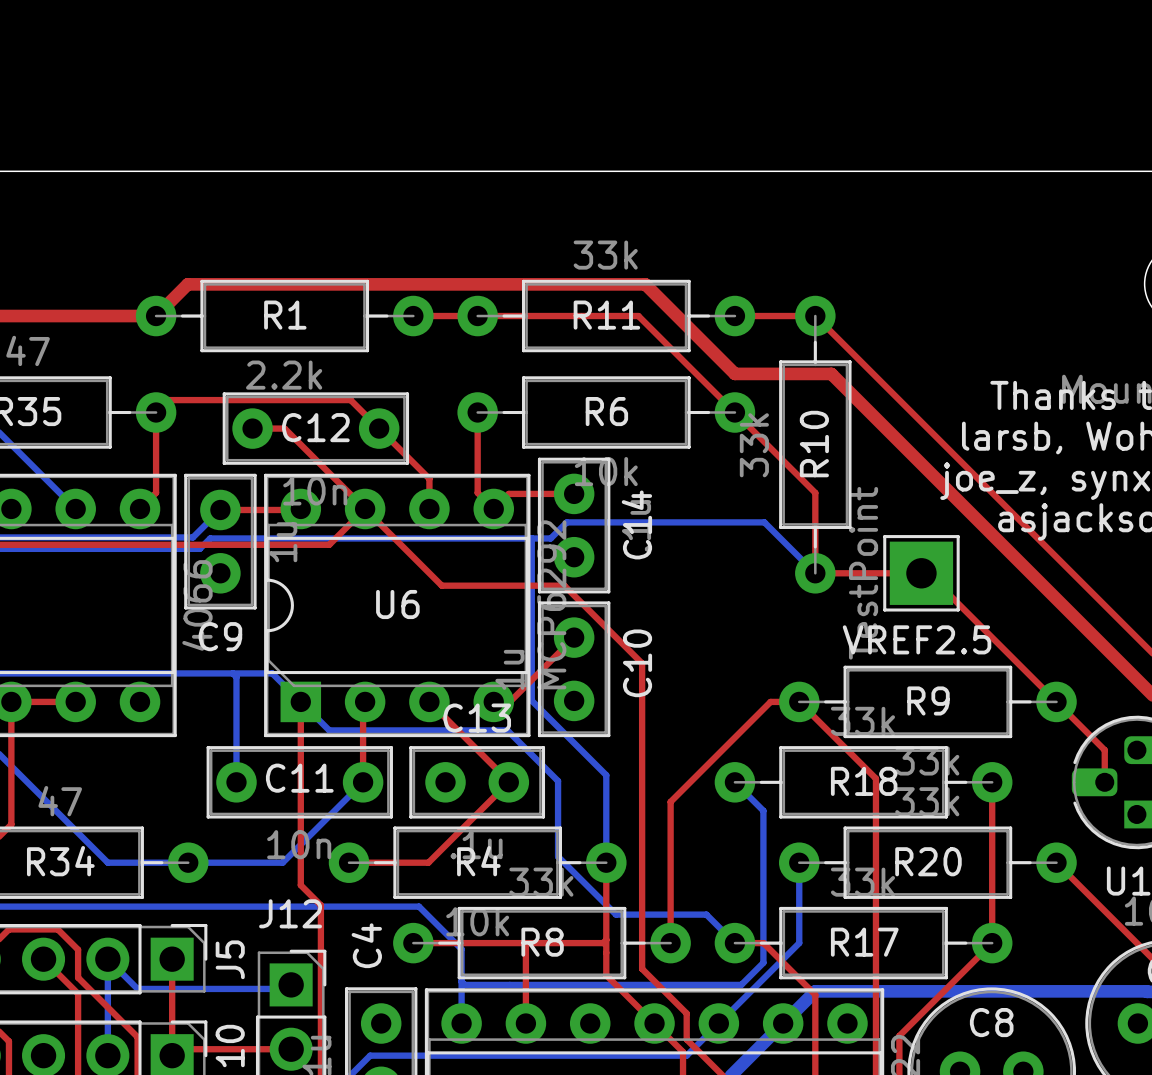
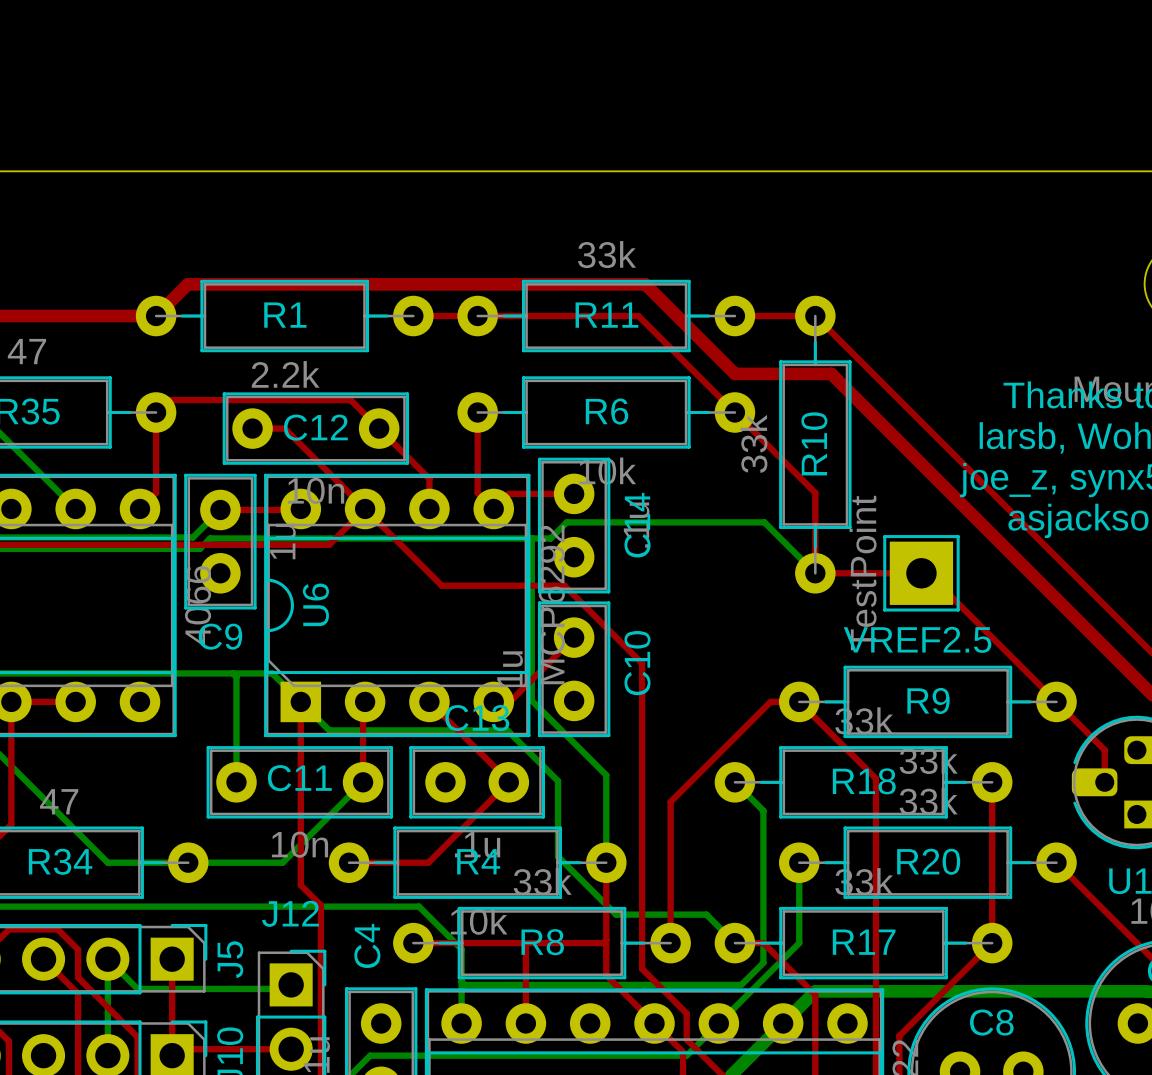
U6 name rotation: 0° (397, 604) -> 90° counterclockwise (315, 604)
U6 name position: U6 (397, 604) -> U6 (315, 604)

